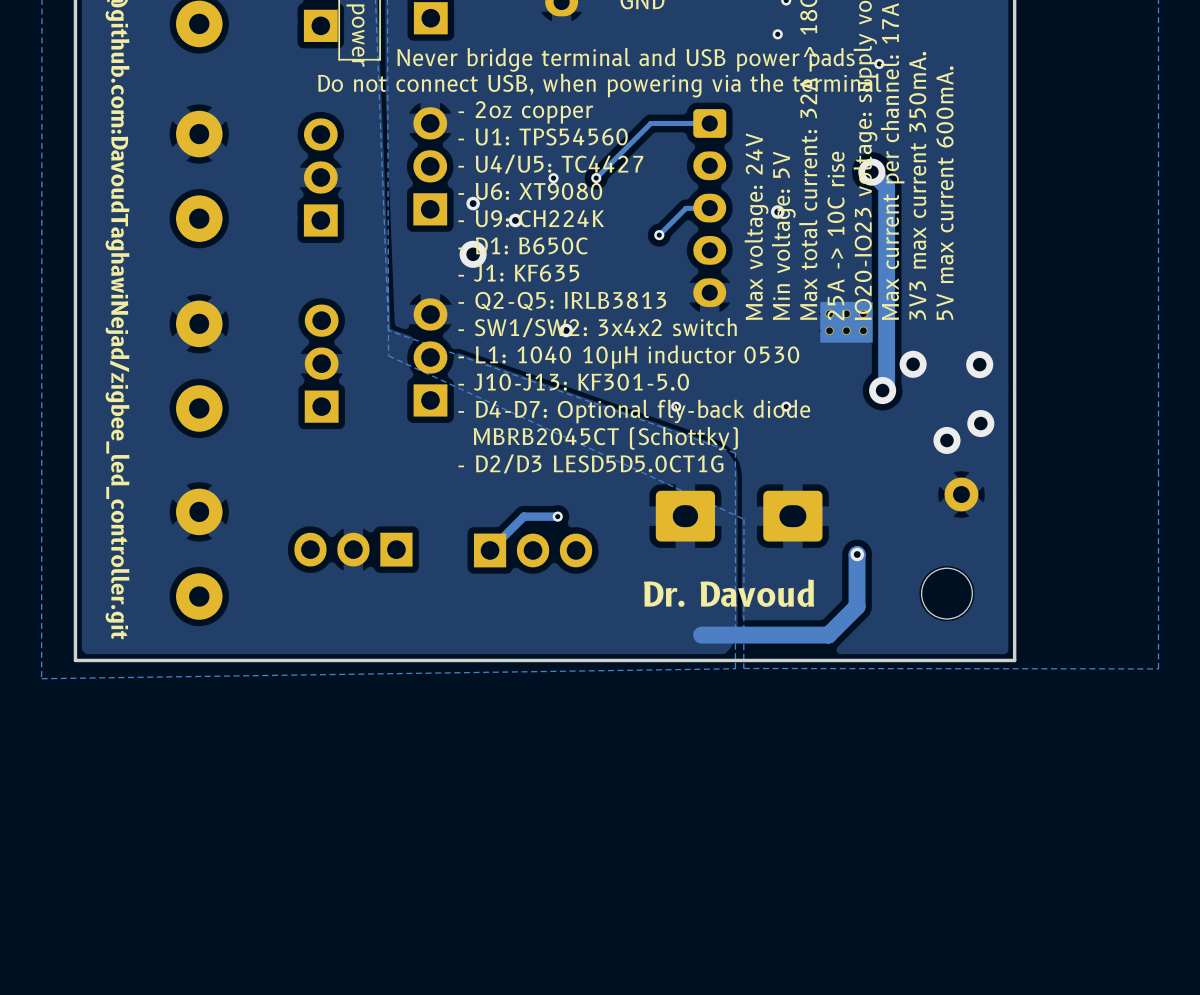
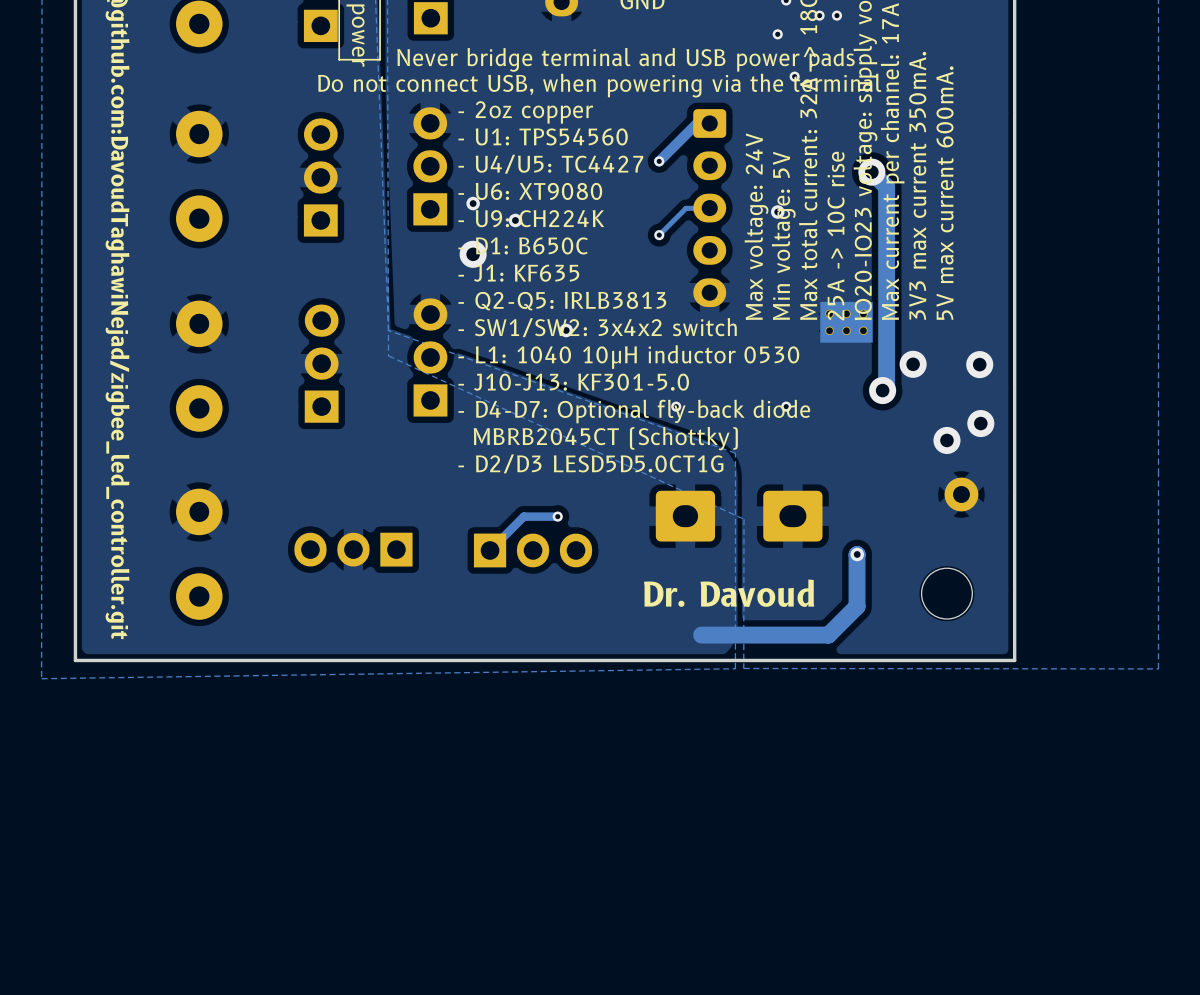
via: none -> (819, 15)
via: none -> (836, 15)
via: (879, 63) -> none
via: none -> (794, 76)
track: (709, 123) (650, 123) (596, 178) -> (709, 123) (696, 123) (659, 161)
via: none -> (659, 161)
via: (553, 178) -> none
via: (596, 178) -> none

